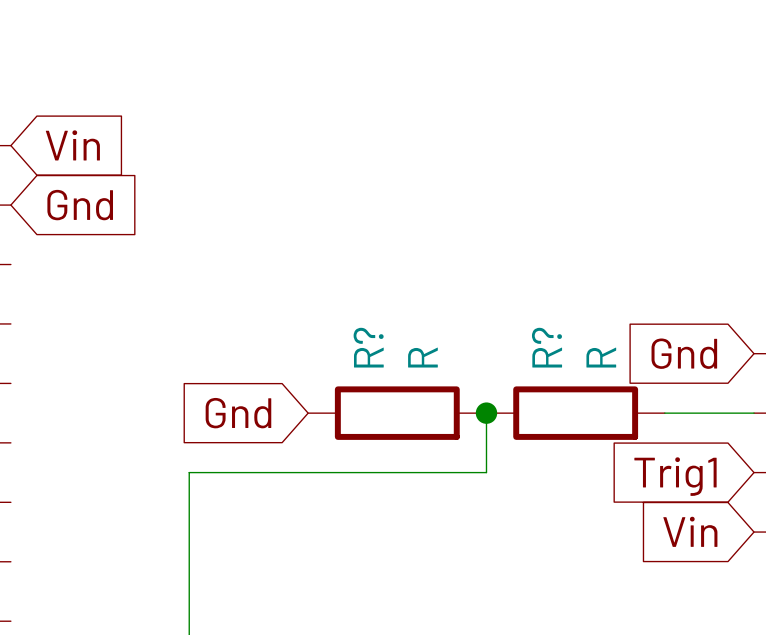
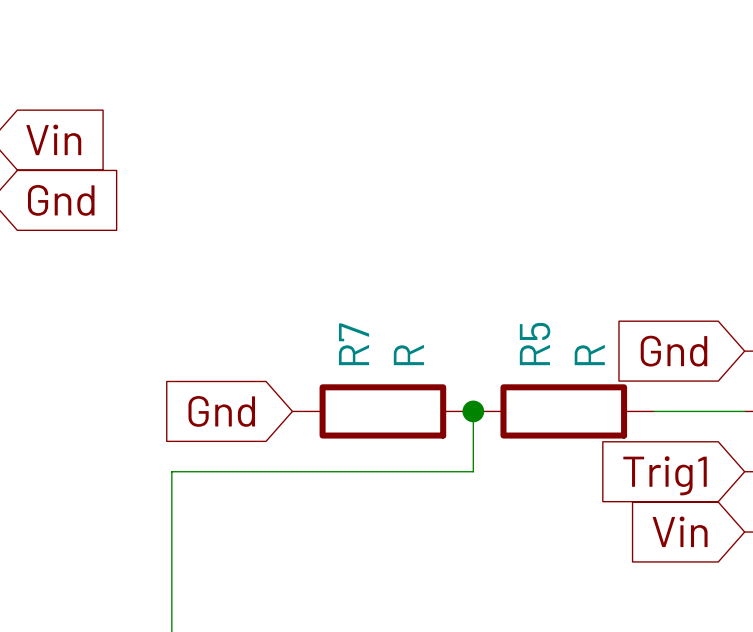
R? name: R? (368, 347) -> R7 (354, 344)
R? name: R? (547, 347) -> R5 (535, 344)

